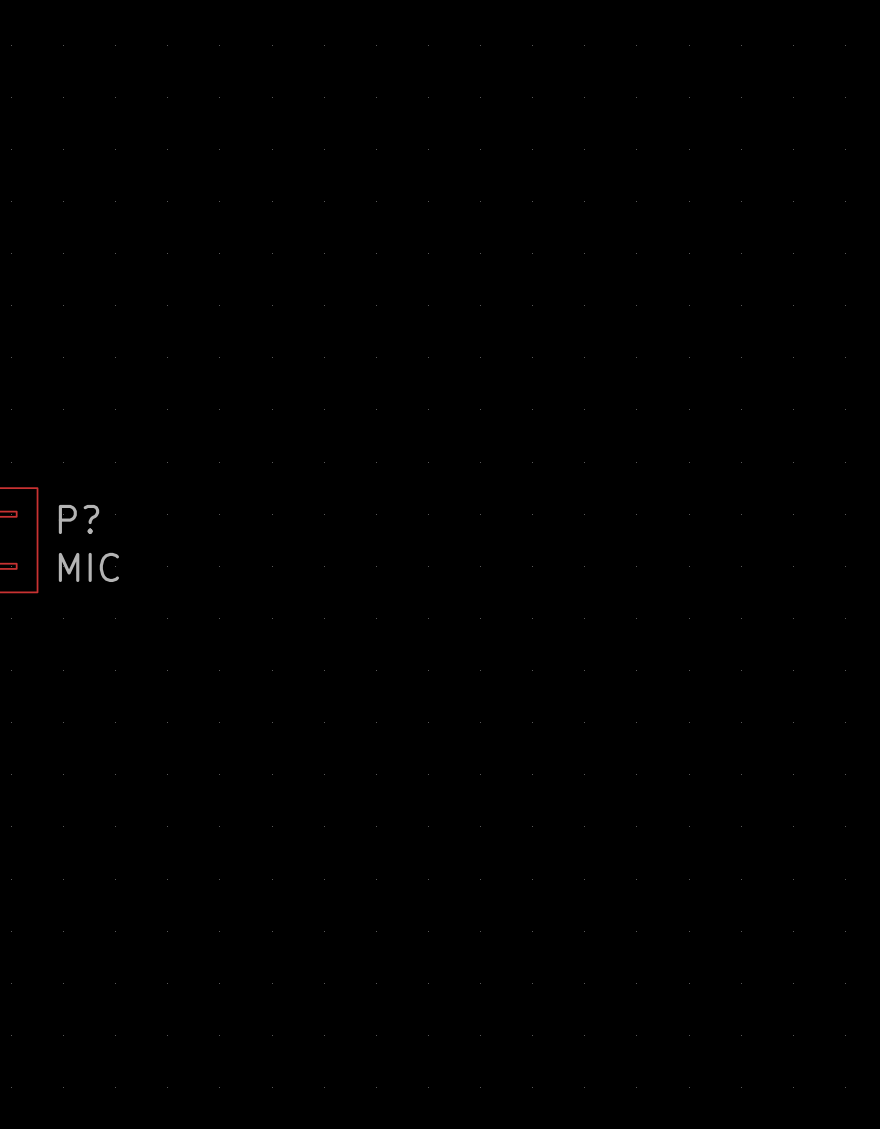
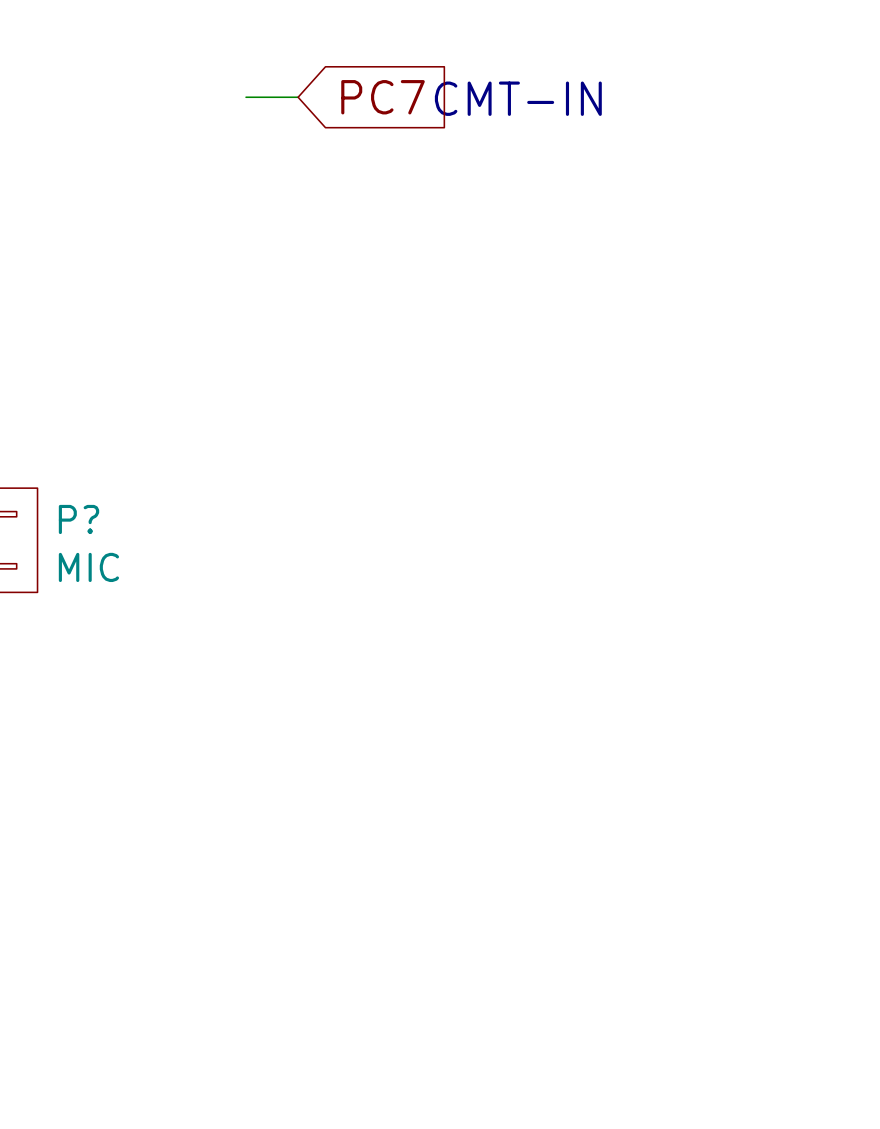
wire: none -> (246, 97) (298, 97)
global label: none -> PC7 (383, 97)
text: none -> CMT-IN (518, 98)

